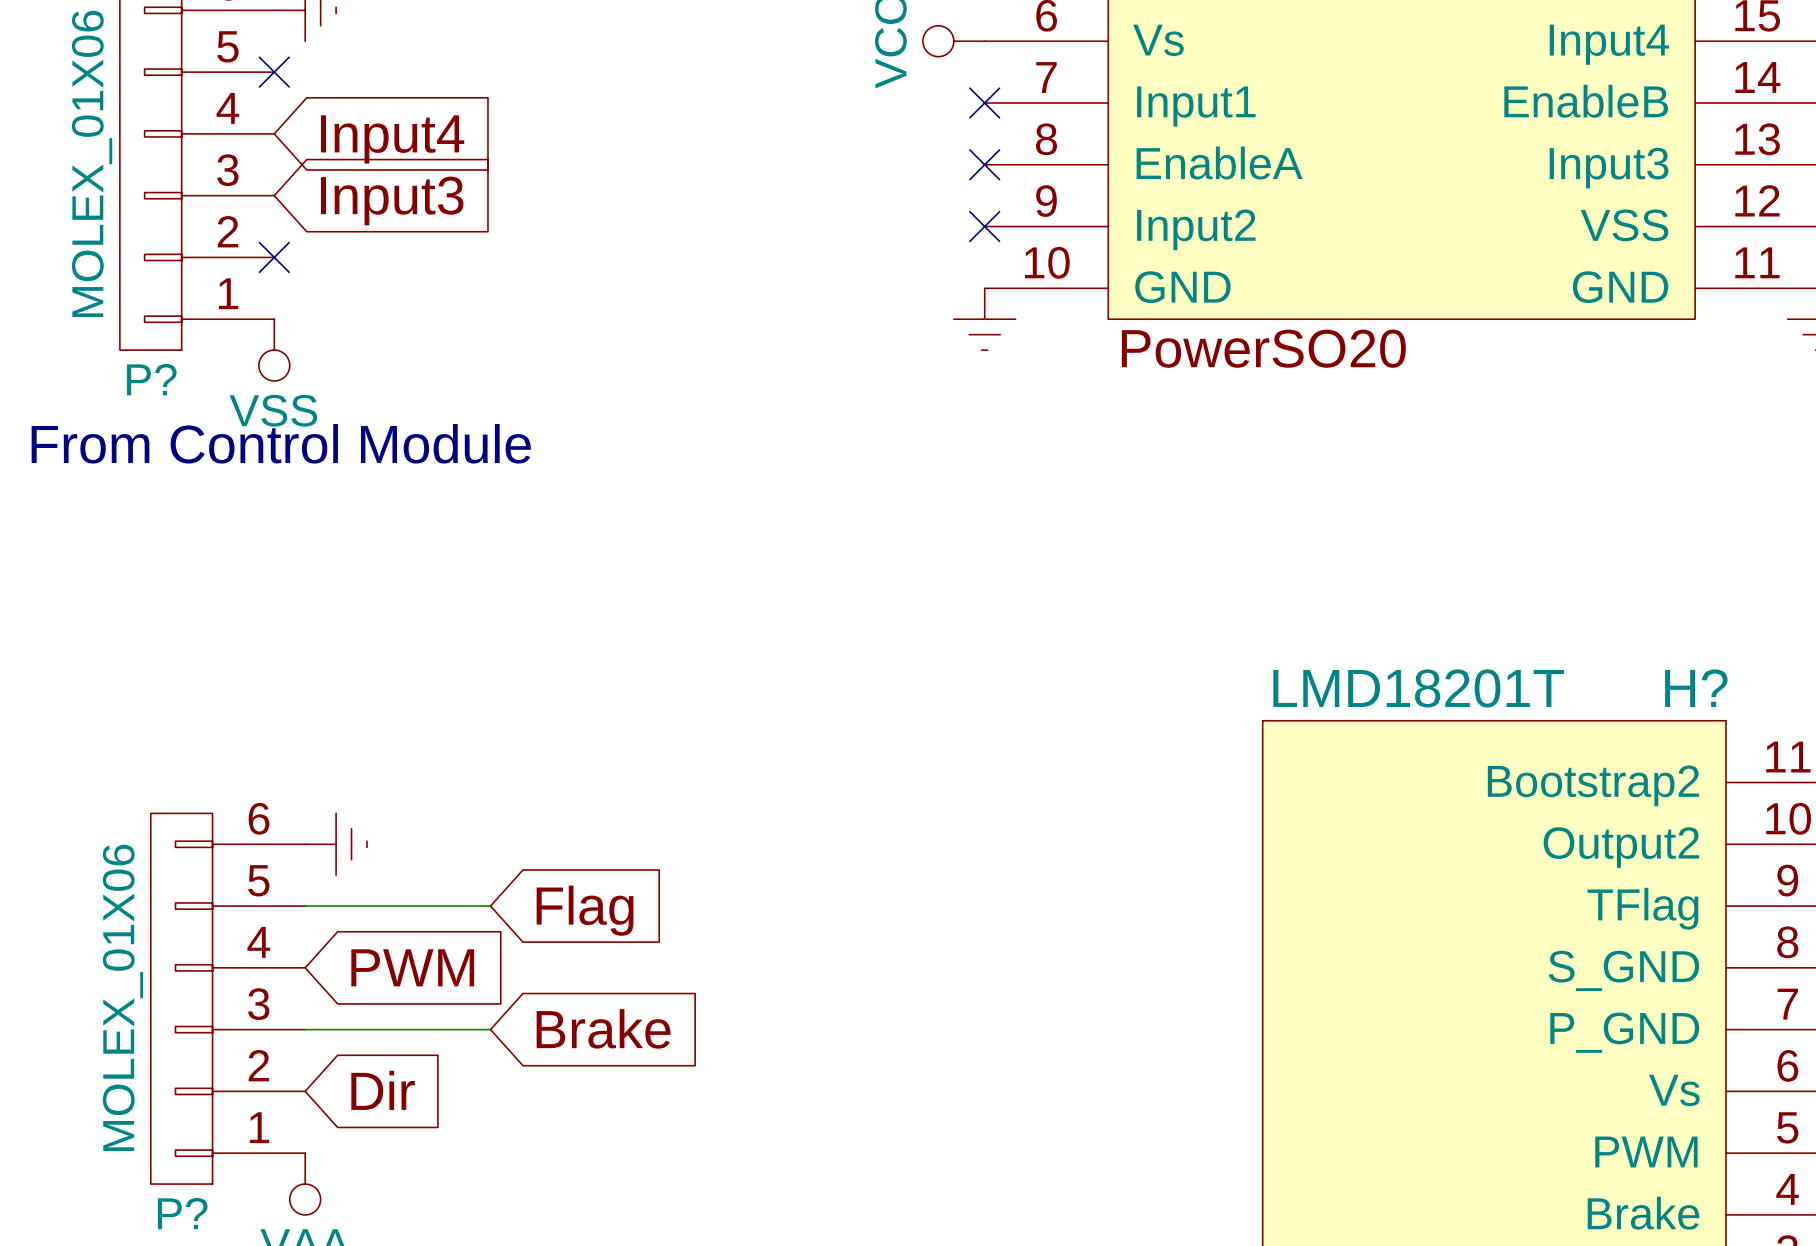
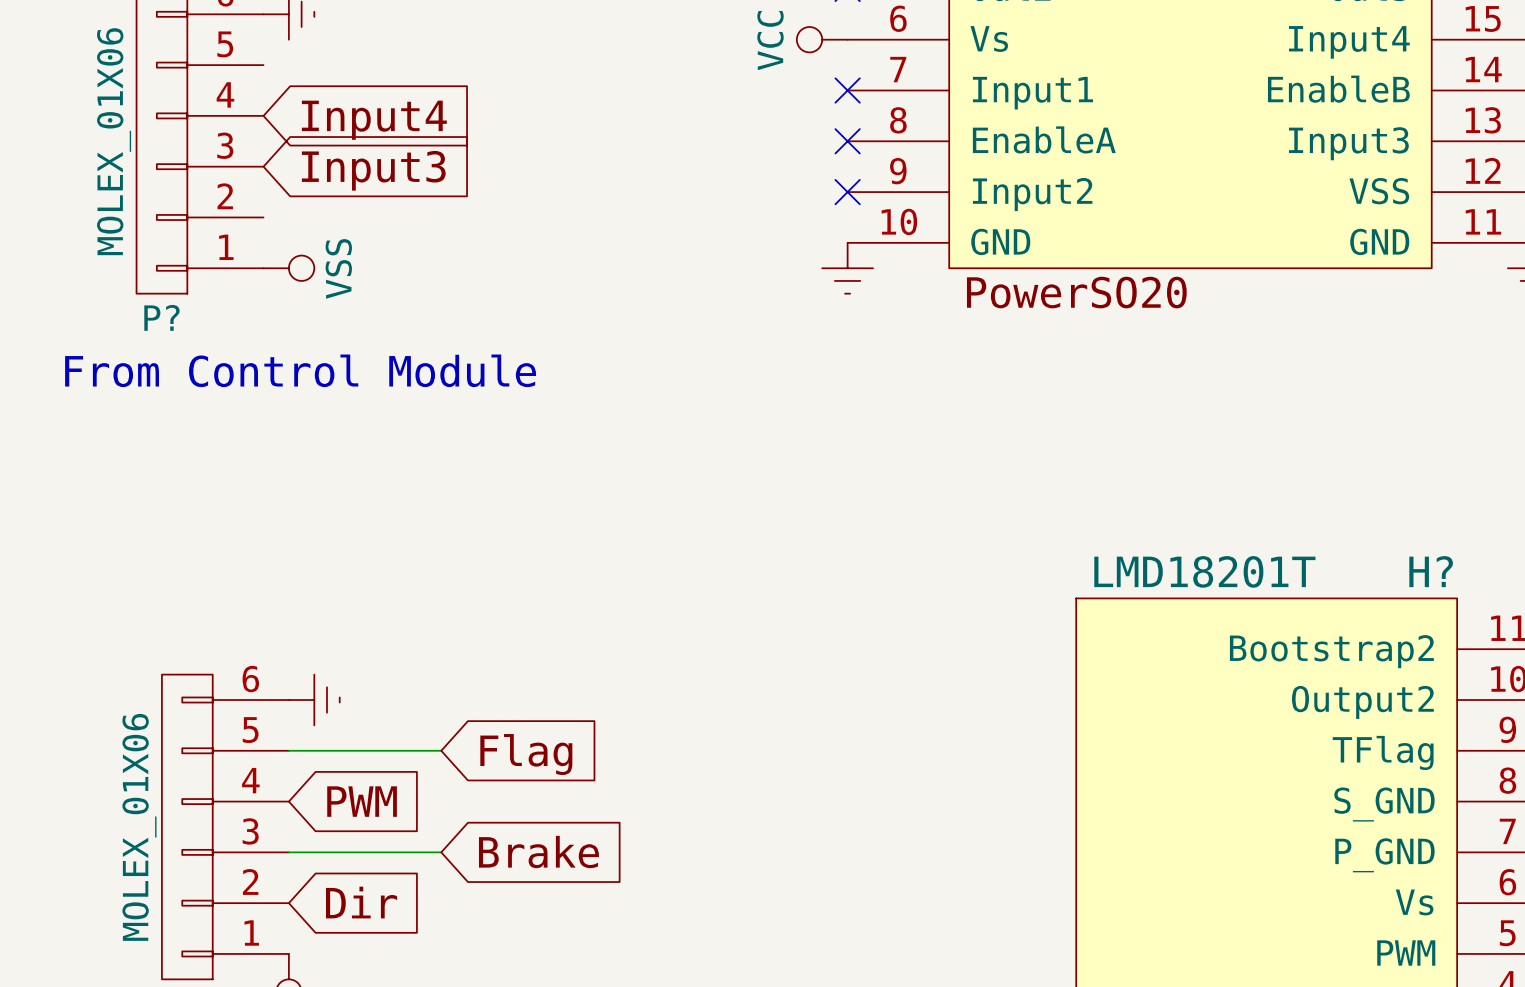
no-connect mark: (274, 72) -> none
no-connect mark: (274, 257) -> none
power symbol rotation: 0° (274, 350) -> 90° counterclockwise (288, 268)
power symbol position: VSS (274, 350) -> VSS (288, 268)

